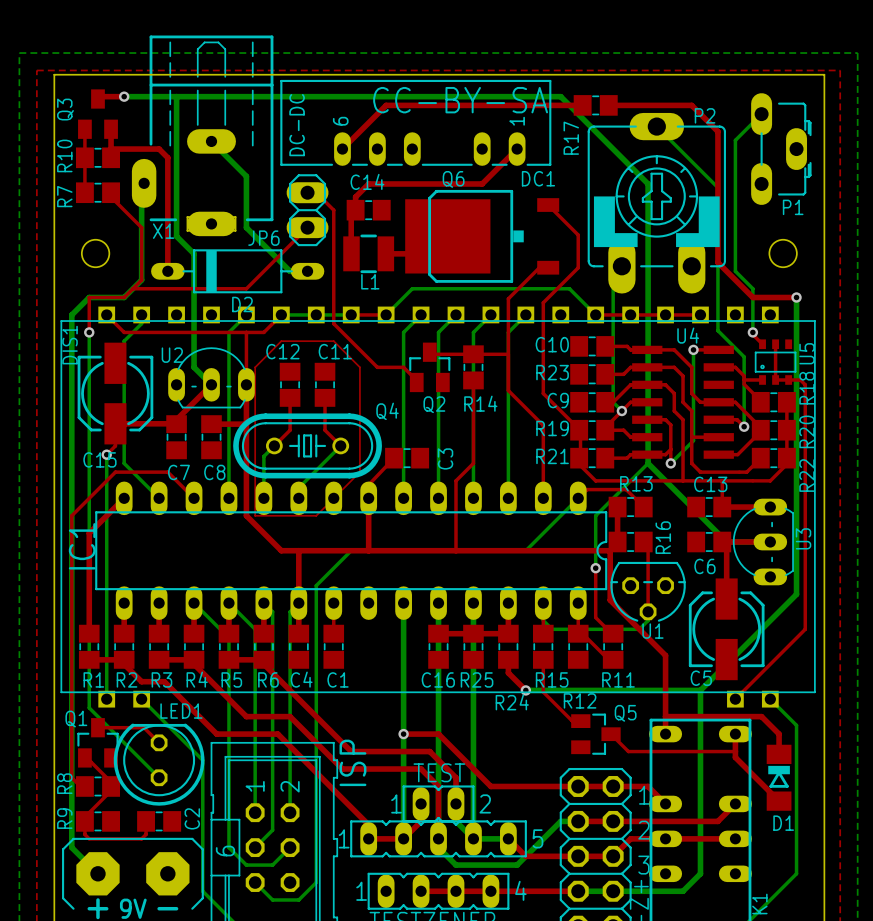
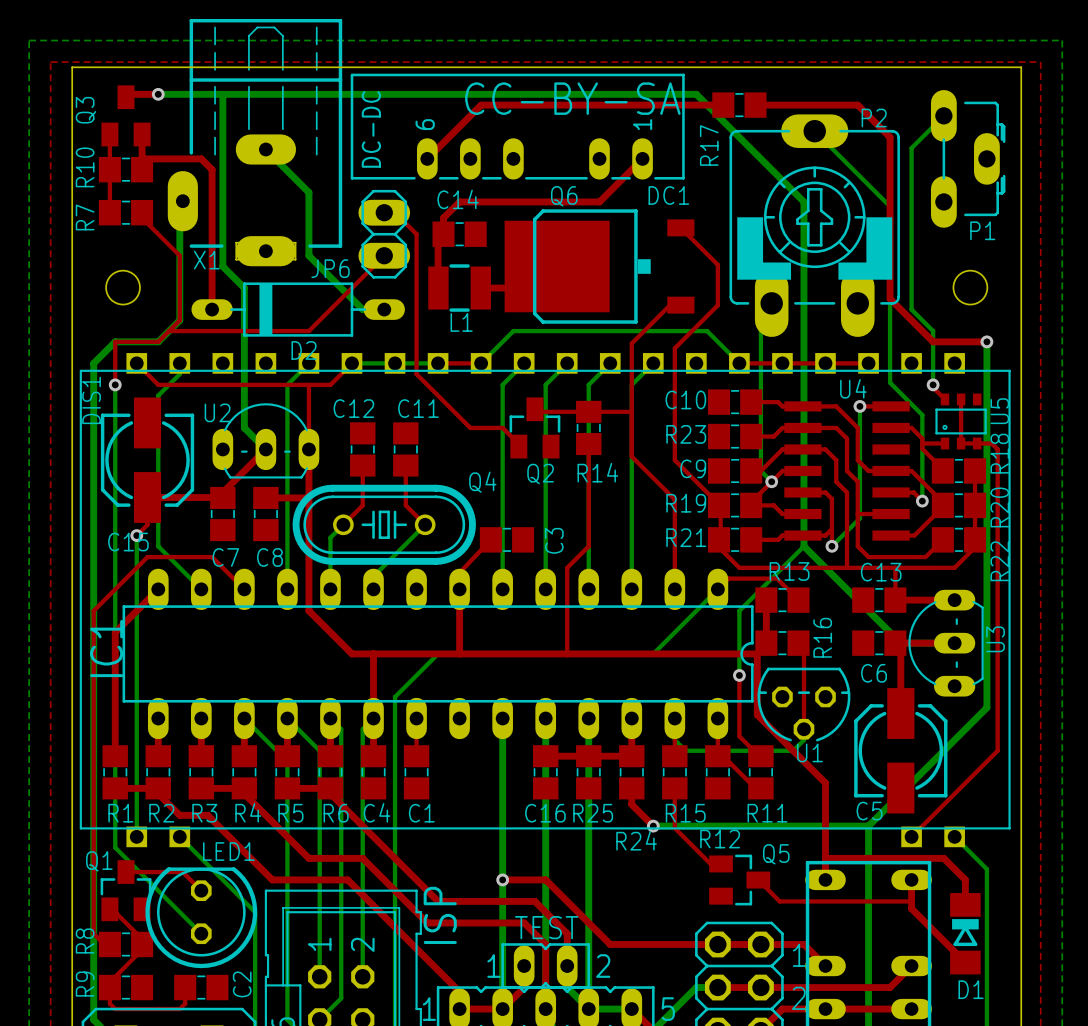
top track: (342, 489) (359, 472) (359, 367) (333, 341) (281, 341) (255, 367) (255, 515) (316, 515) (325, 507) -> none

